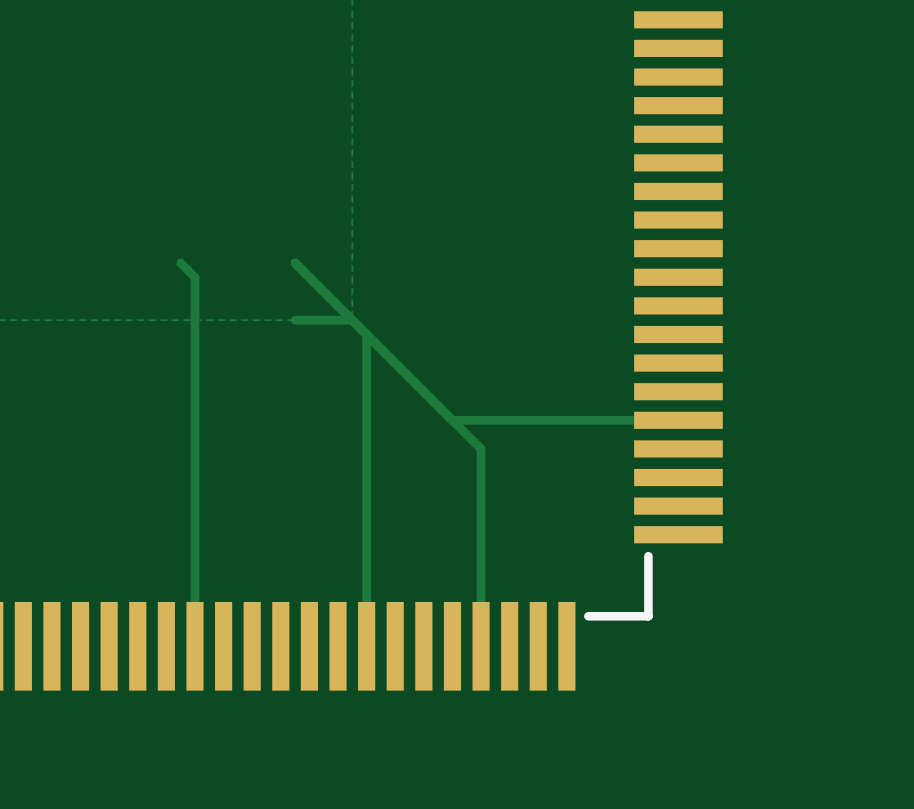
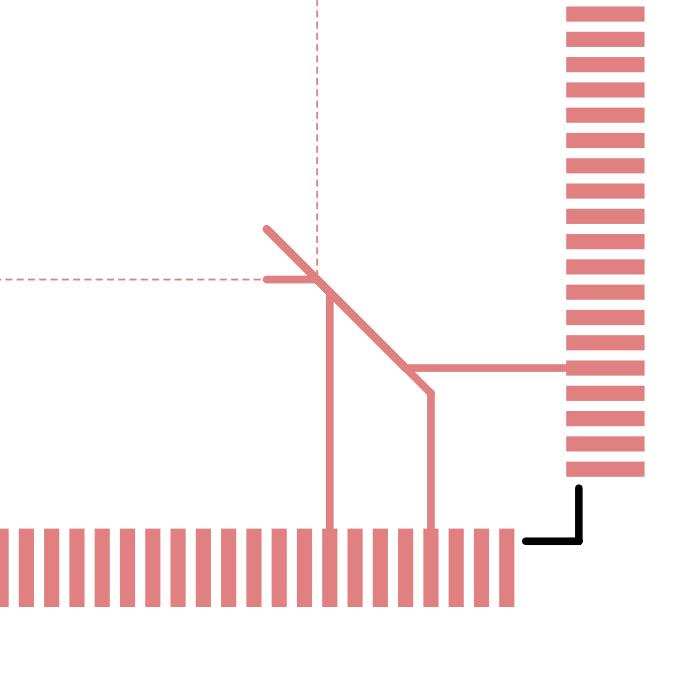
track: (180, 262) (194, 277) (194, 646) -> none

